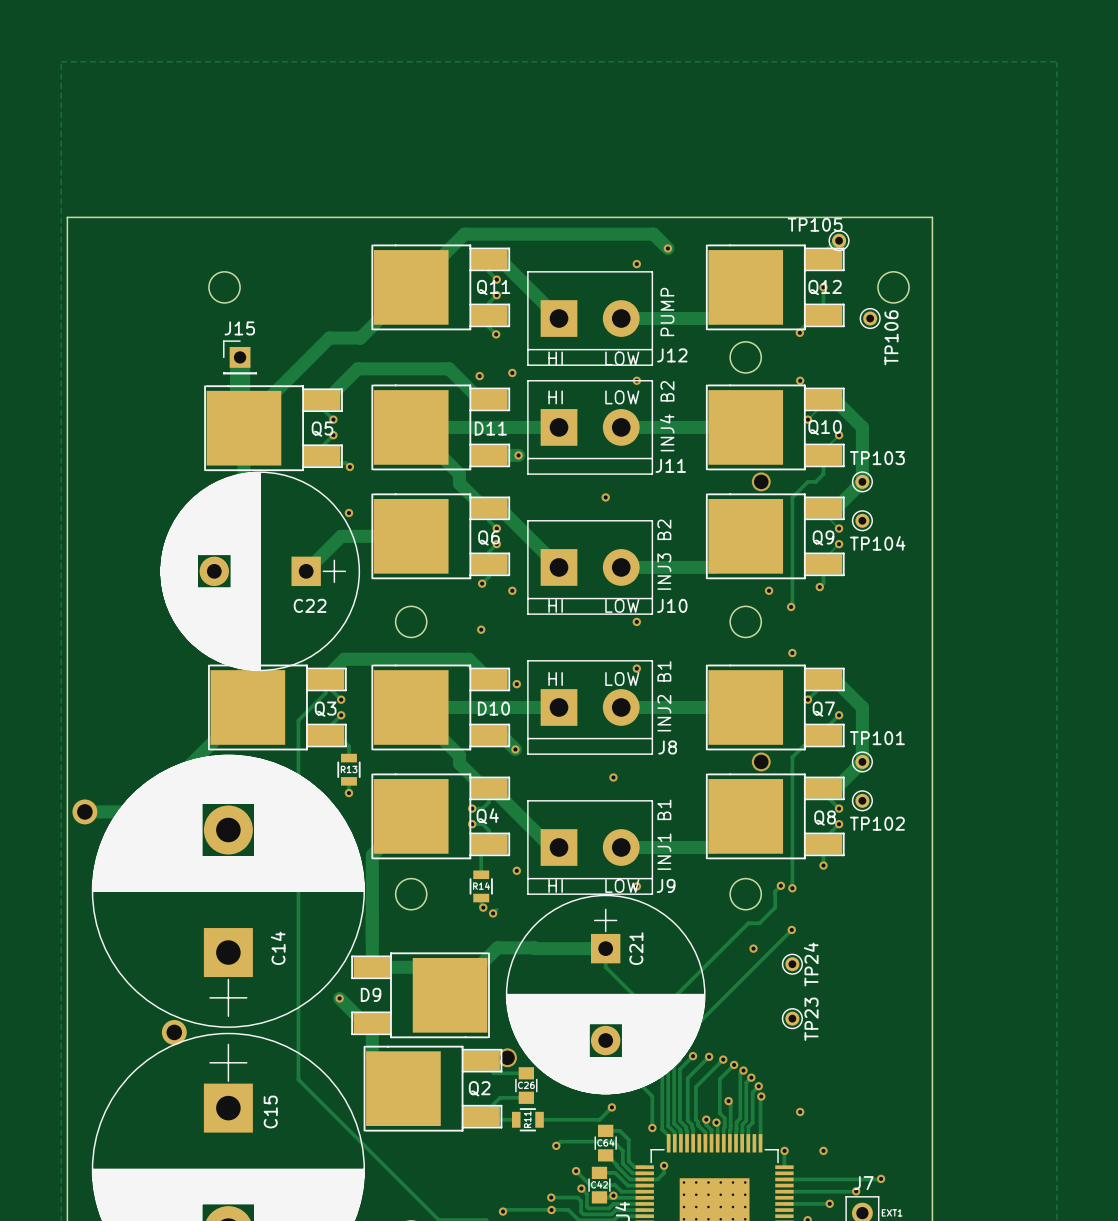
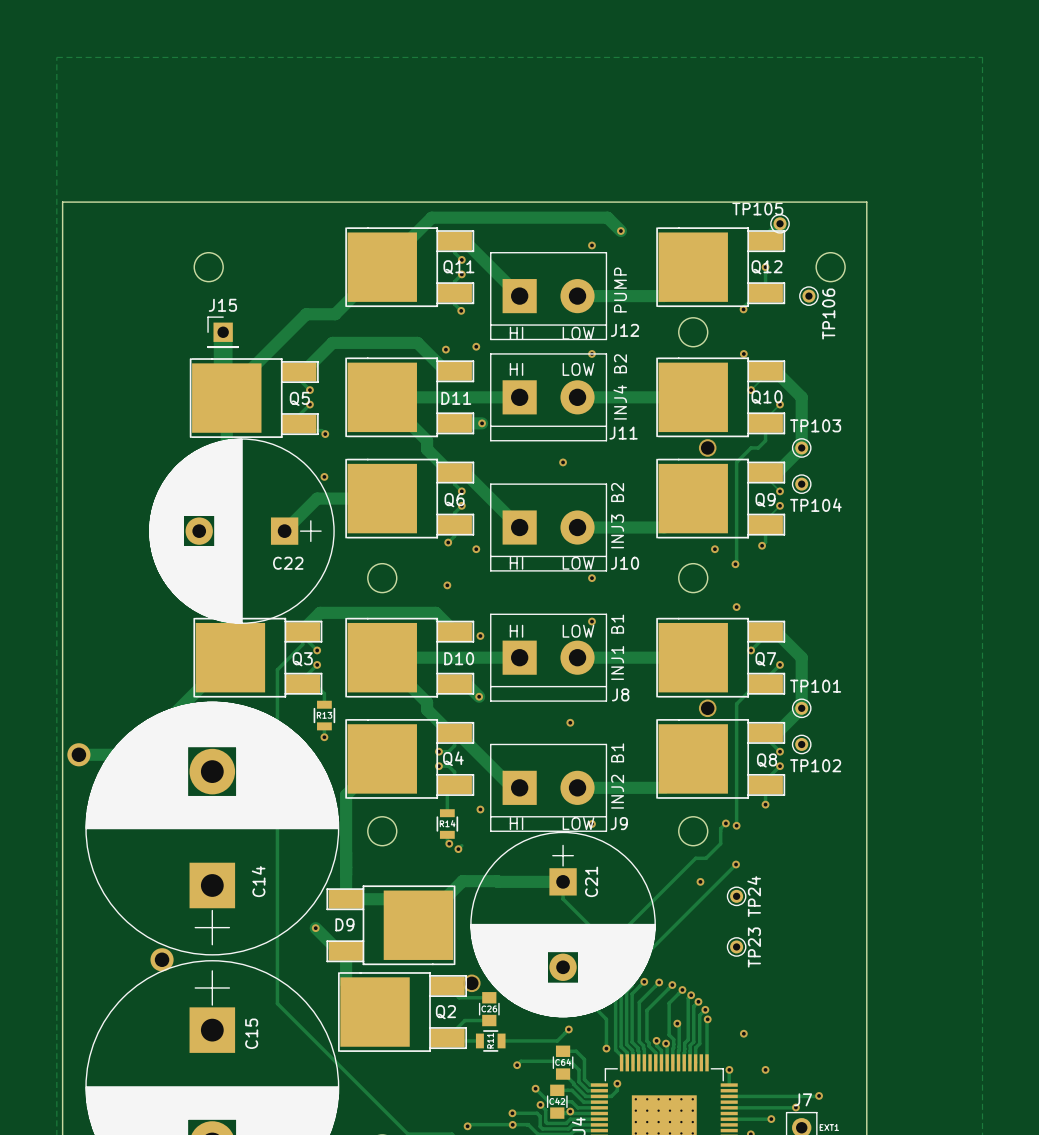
text: INJ2 B1 (664, 696) -> INJ1 B1 (617, 647)
text: INJ1 B1 (664, 834) -> INJ2 B1 (617, 776)

